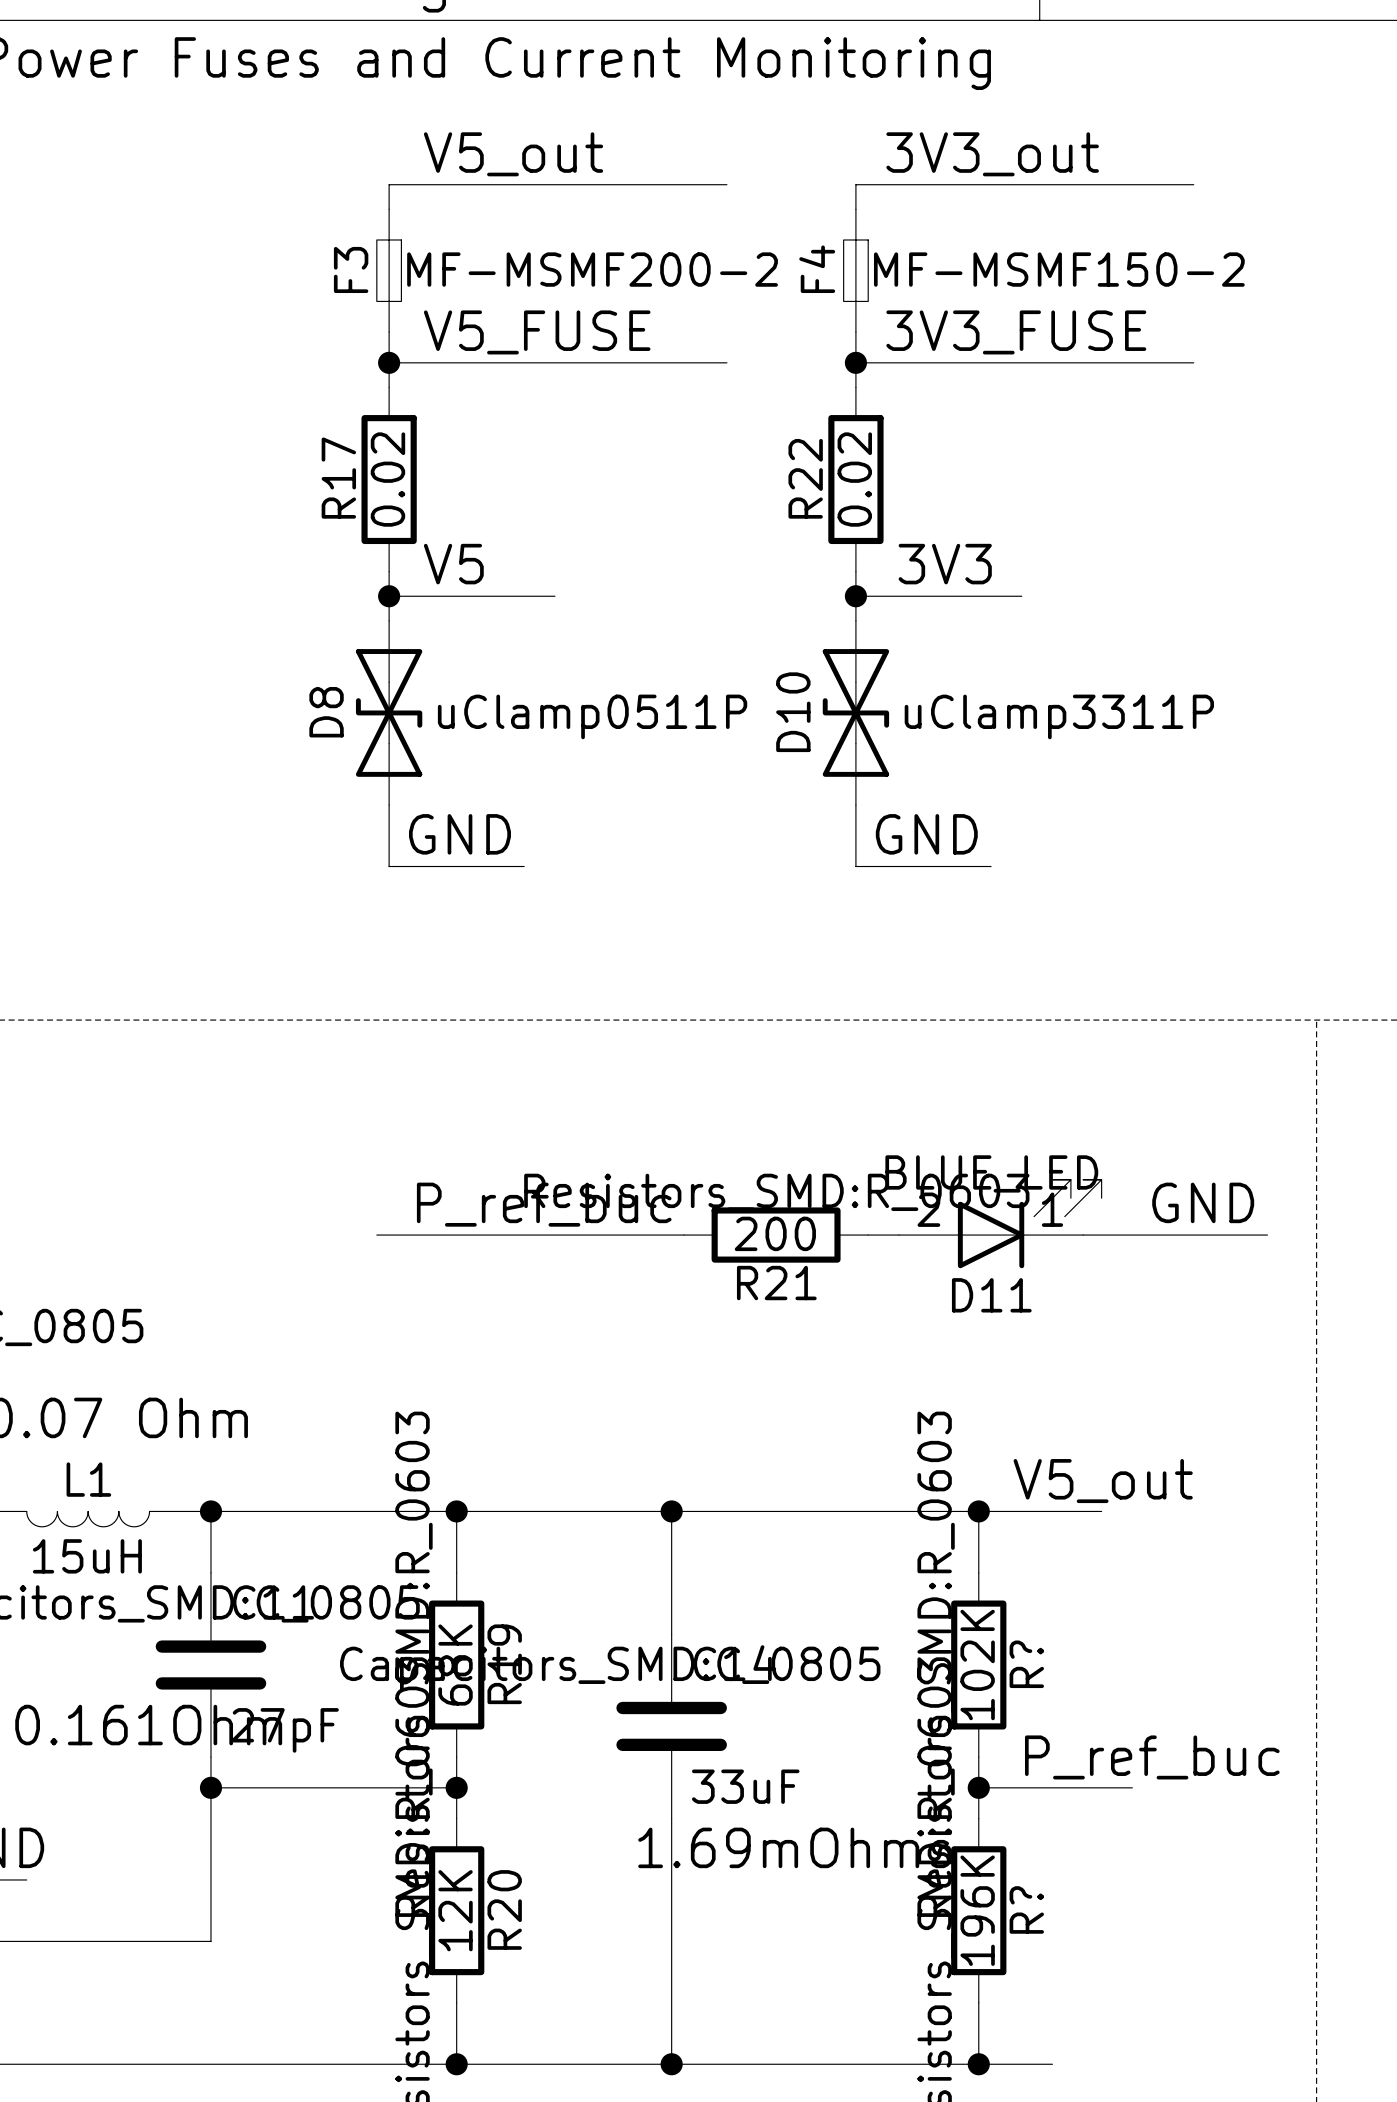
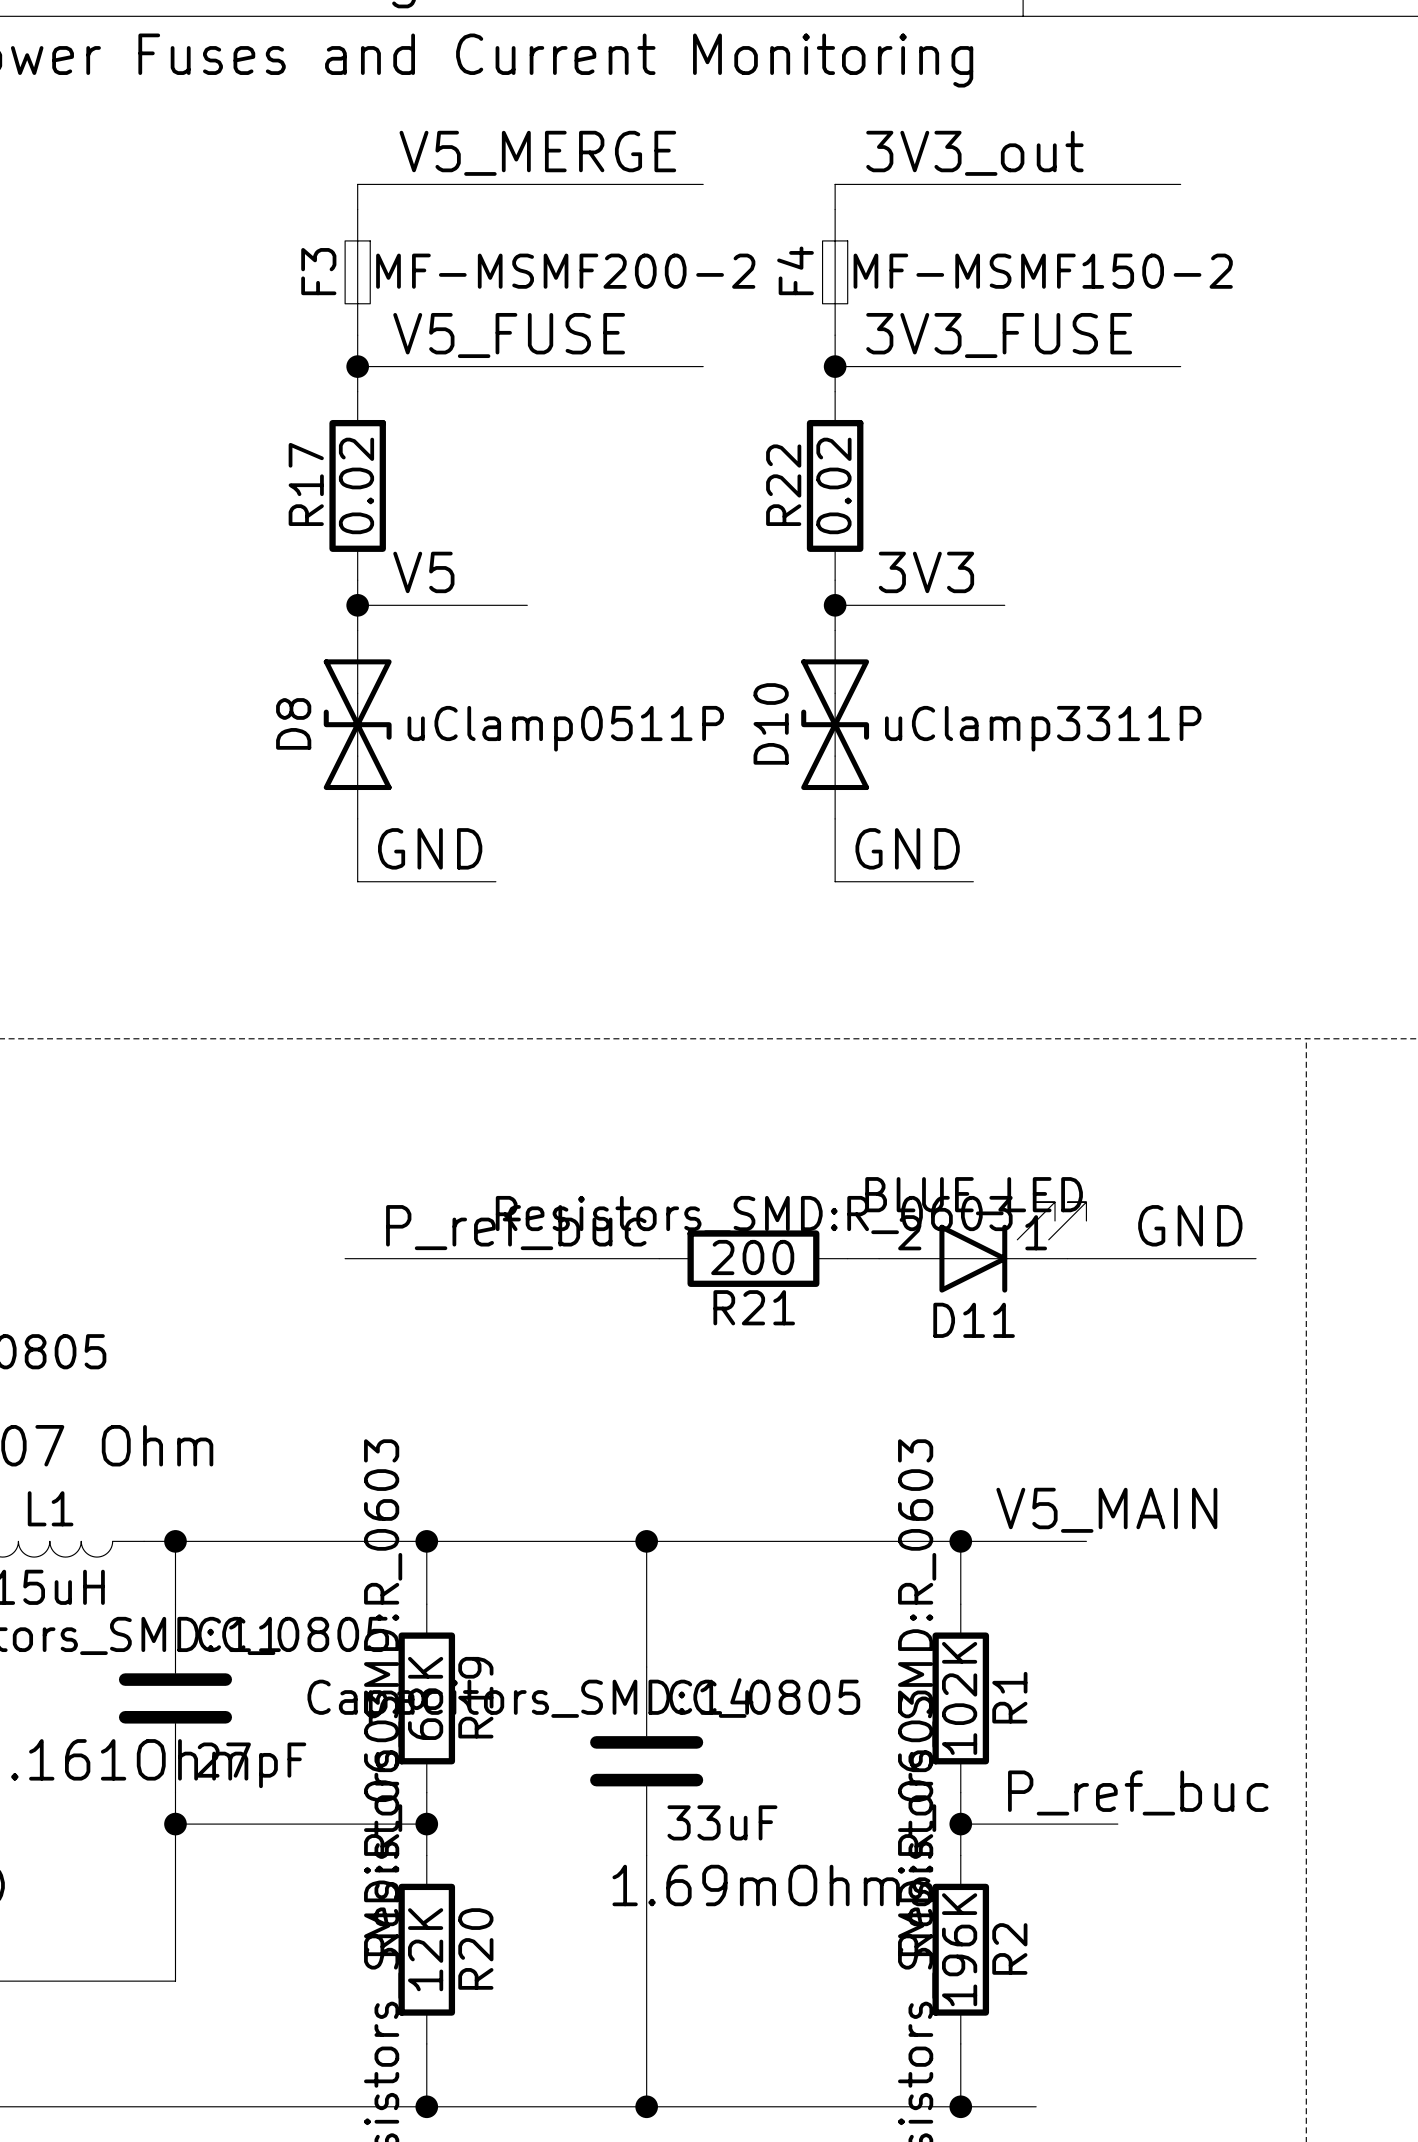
label: V5_out (513, 154) -> V5_MERGE (537, 153)
label: V5_out (1103, 1481) -> V5_MAIN (1106, 1510)
R? name: R? (1026, 1664) -> R1 (1009, 1697)
R? name: R? (1026, 1909) -> R2 (1009, 1948)

